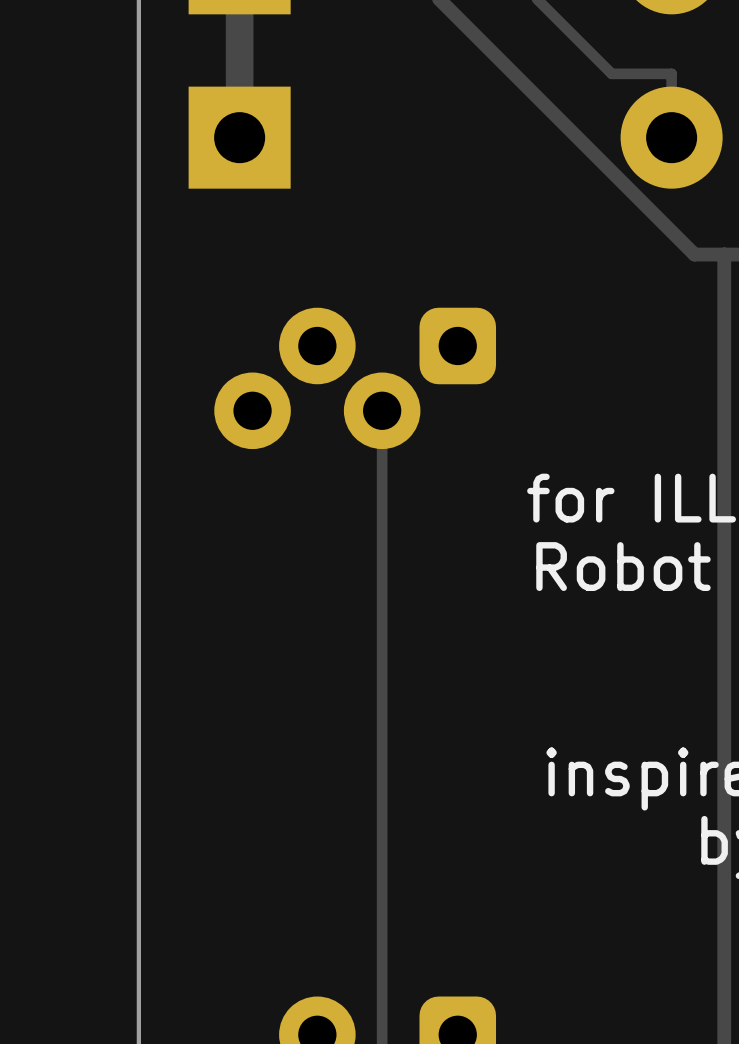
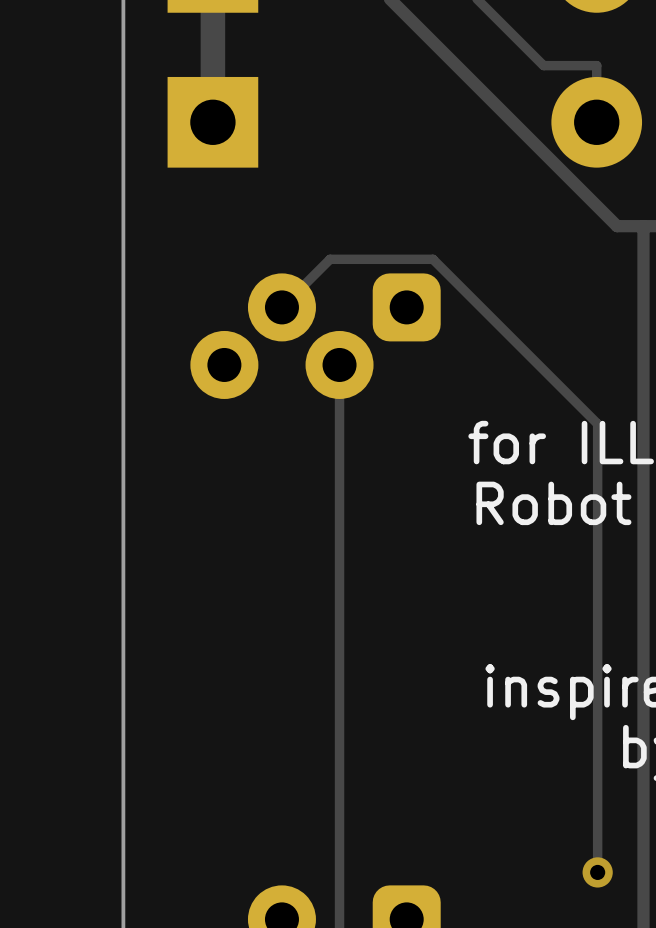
track: none -> (281, 307) (330, 259) (432, 259) (597, 423) (597, 872)
via: none -> (597, 872)

